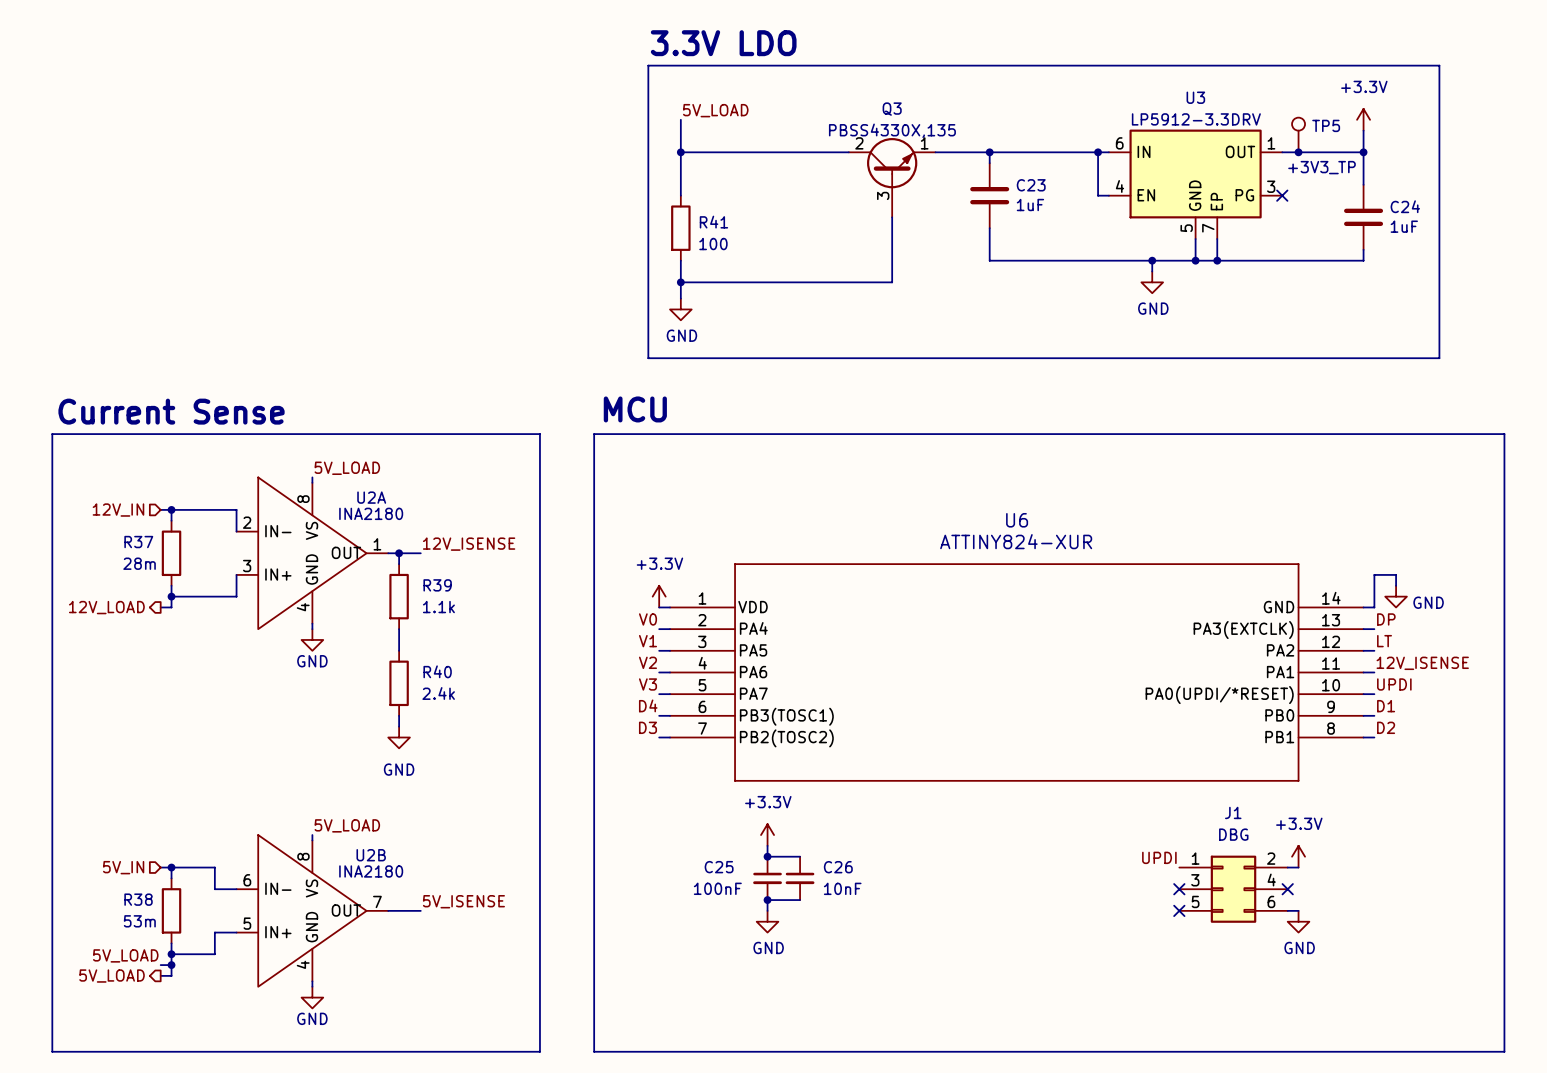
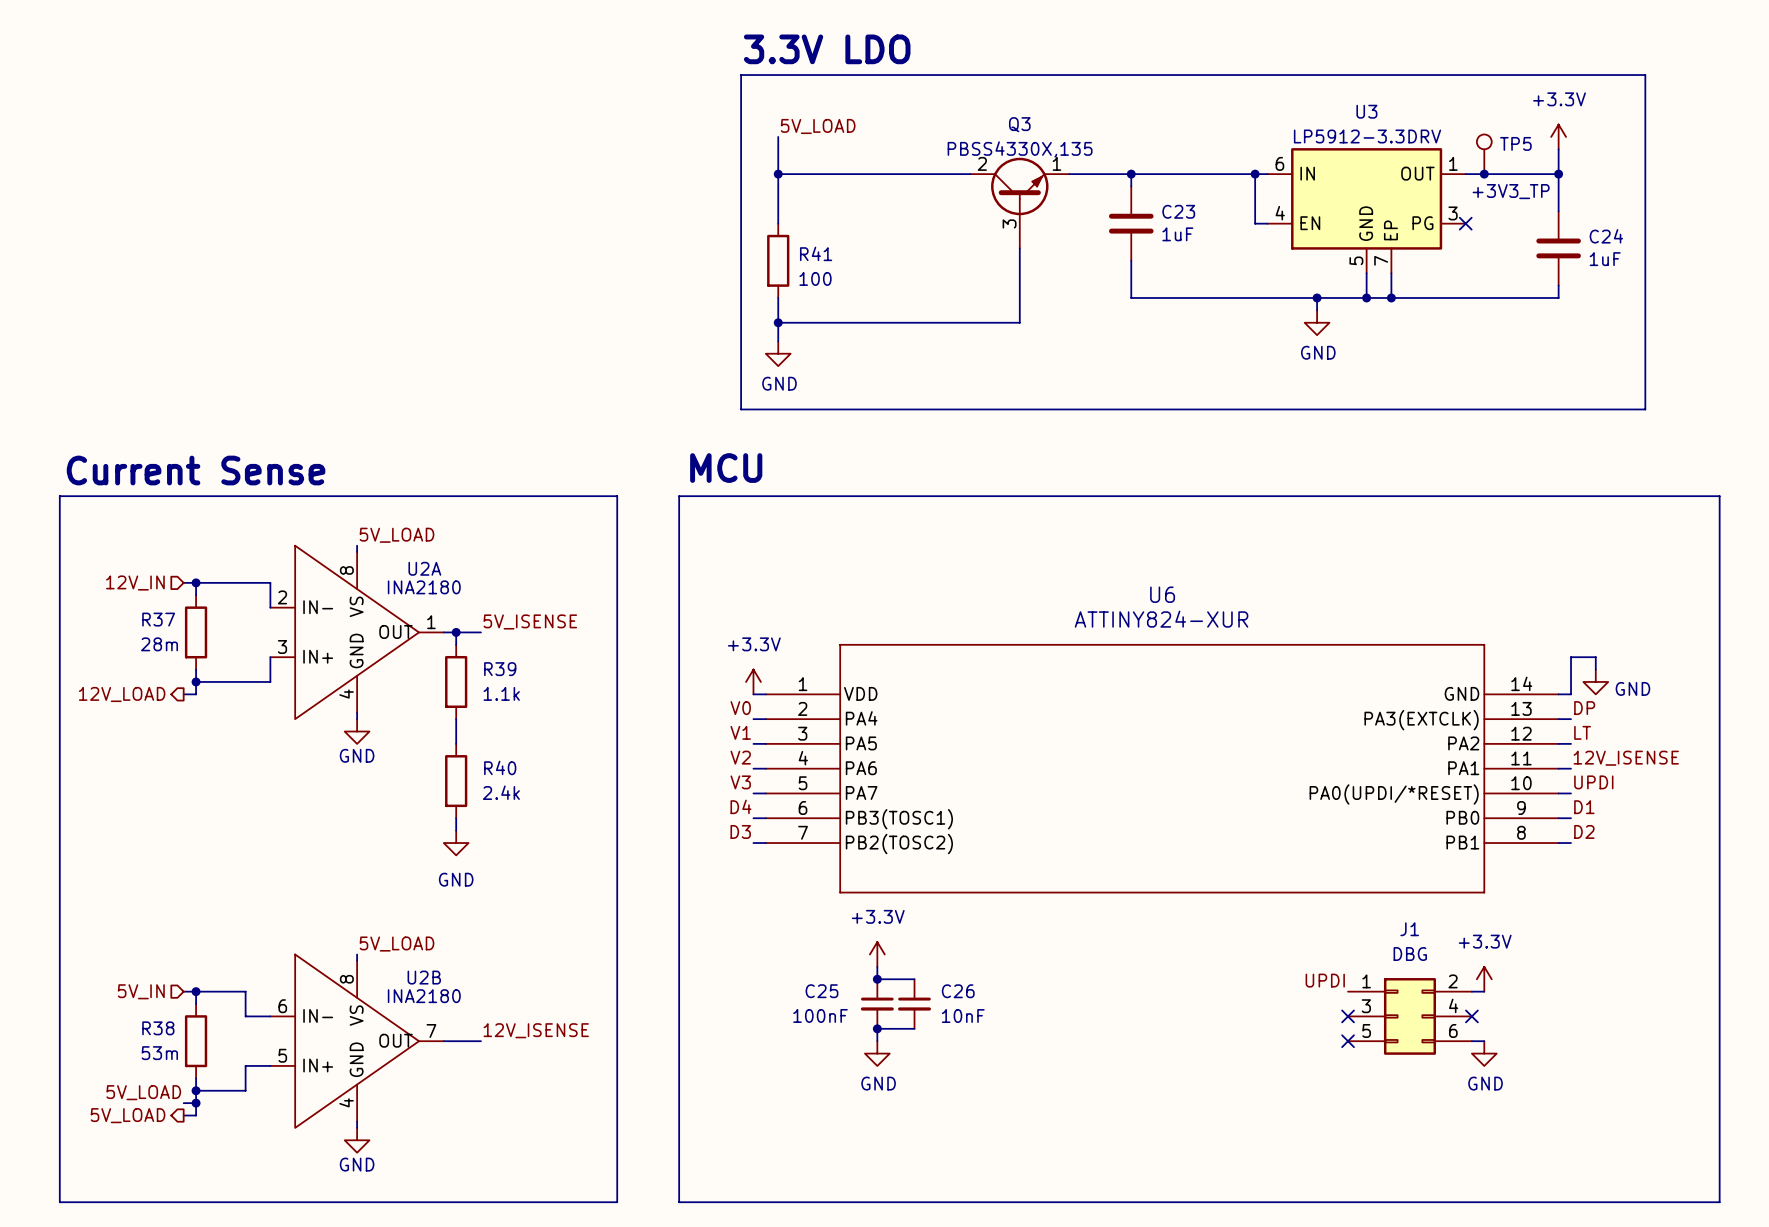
label: 12V_ISENSE (469, 544) -> 5V_ISENSE (530, 621)
label: 5V_ISENSE (463, 901) -> 12V_ISENSE (536, 1030)

